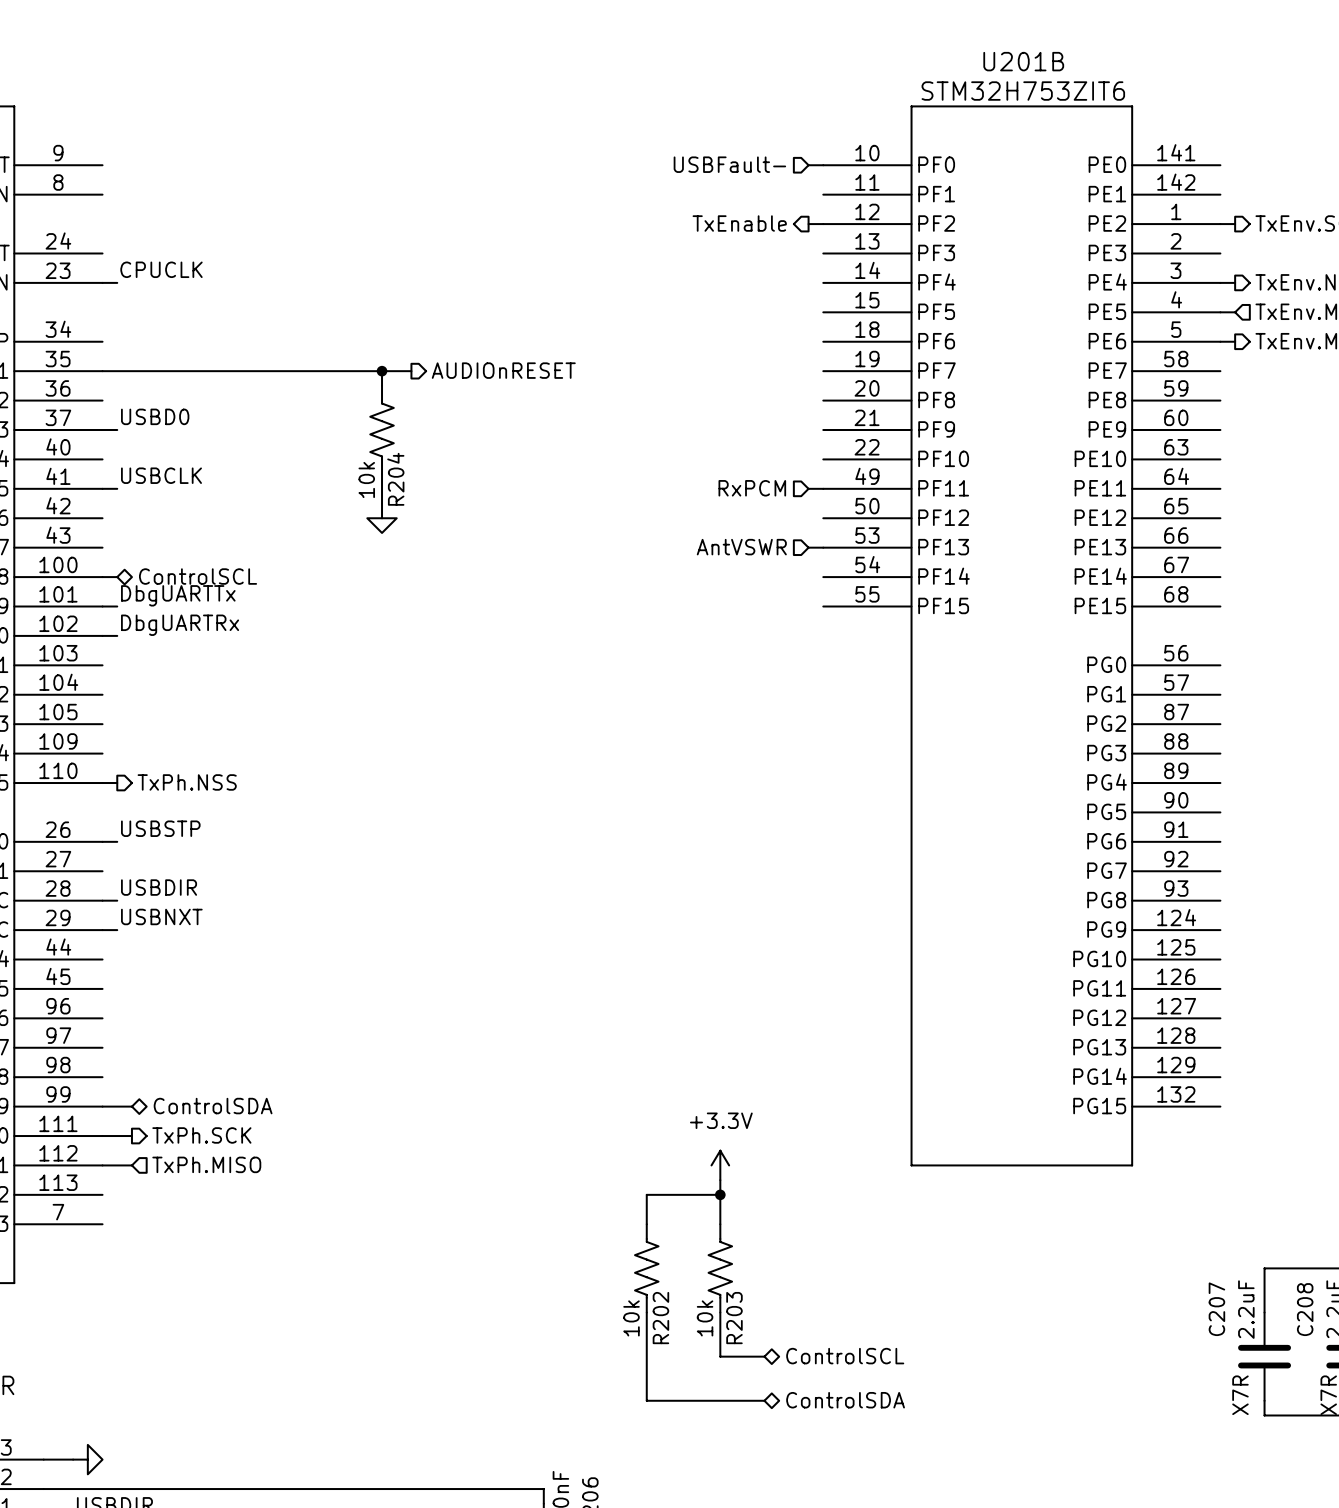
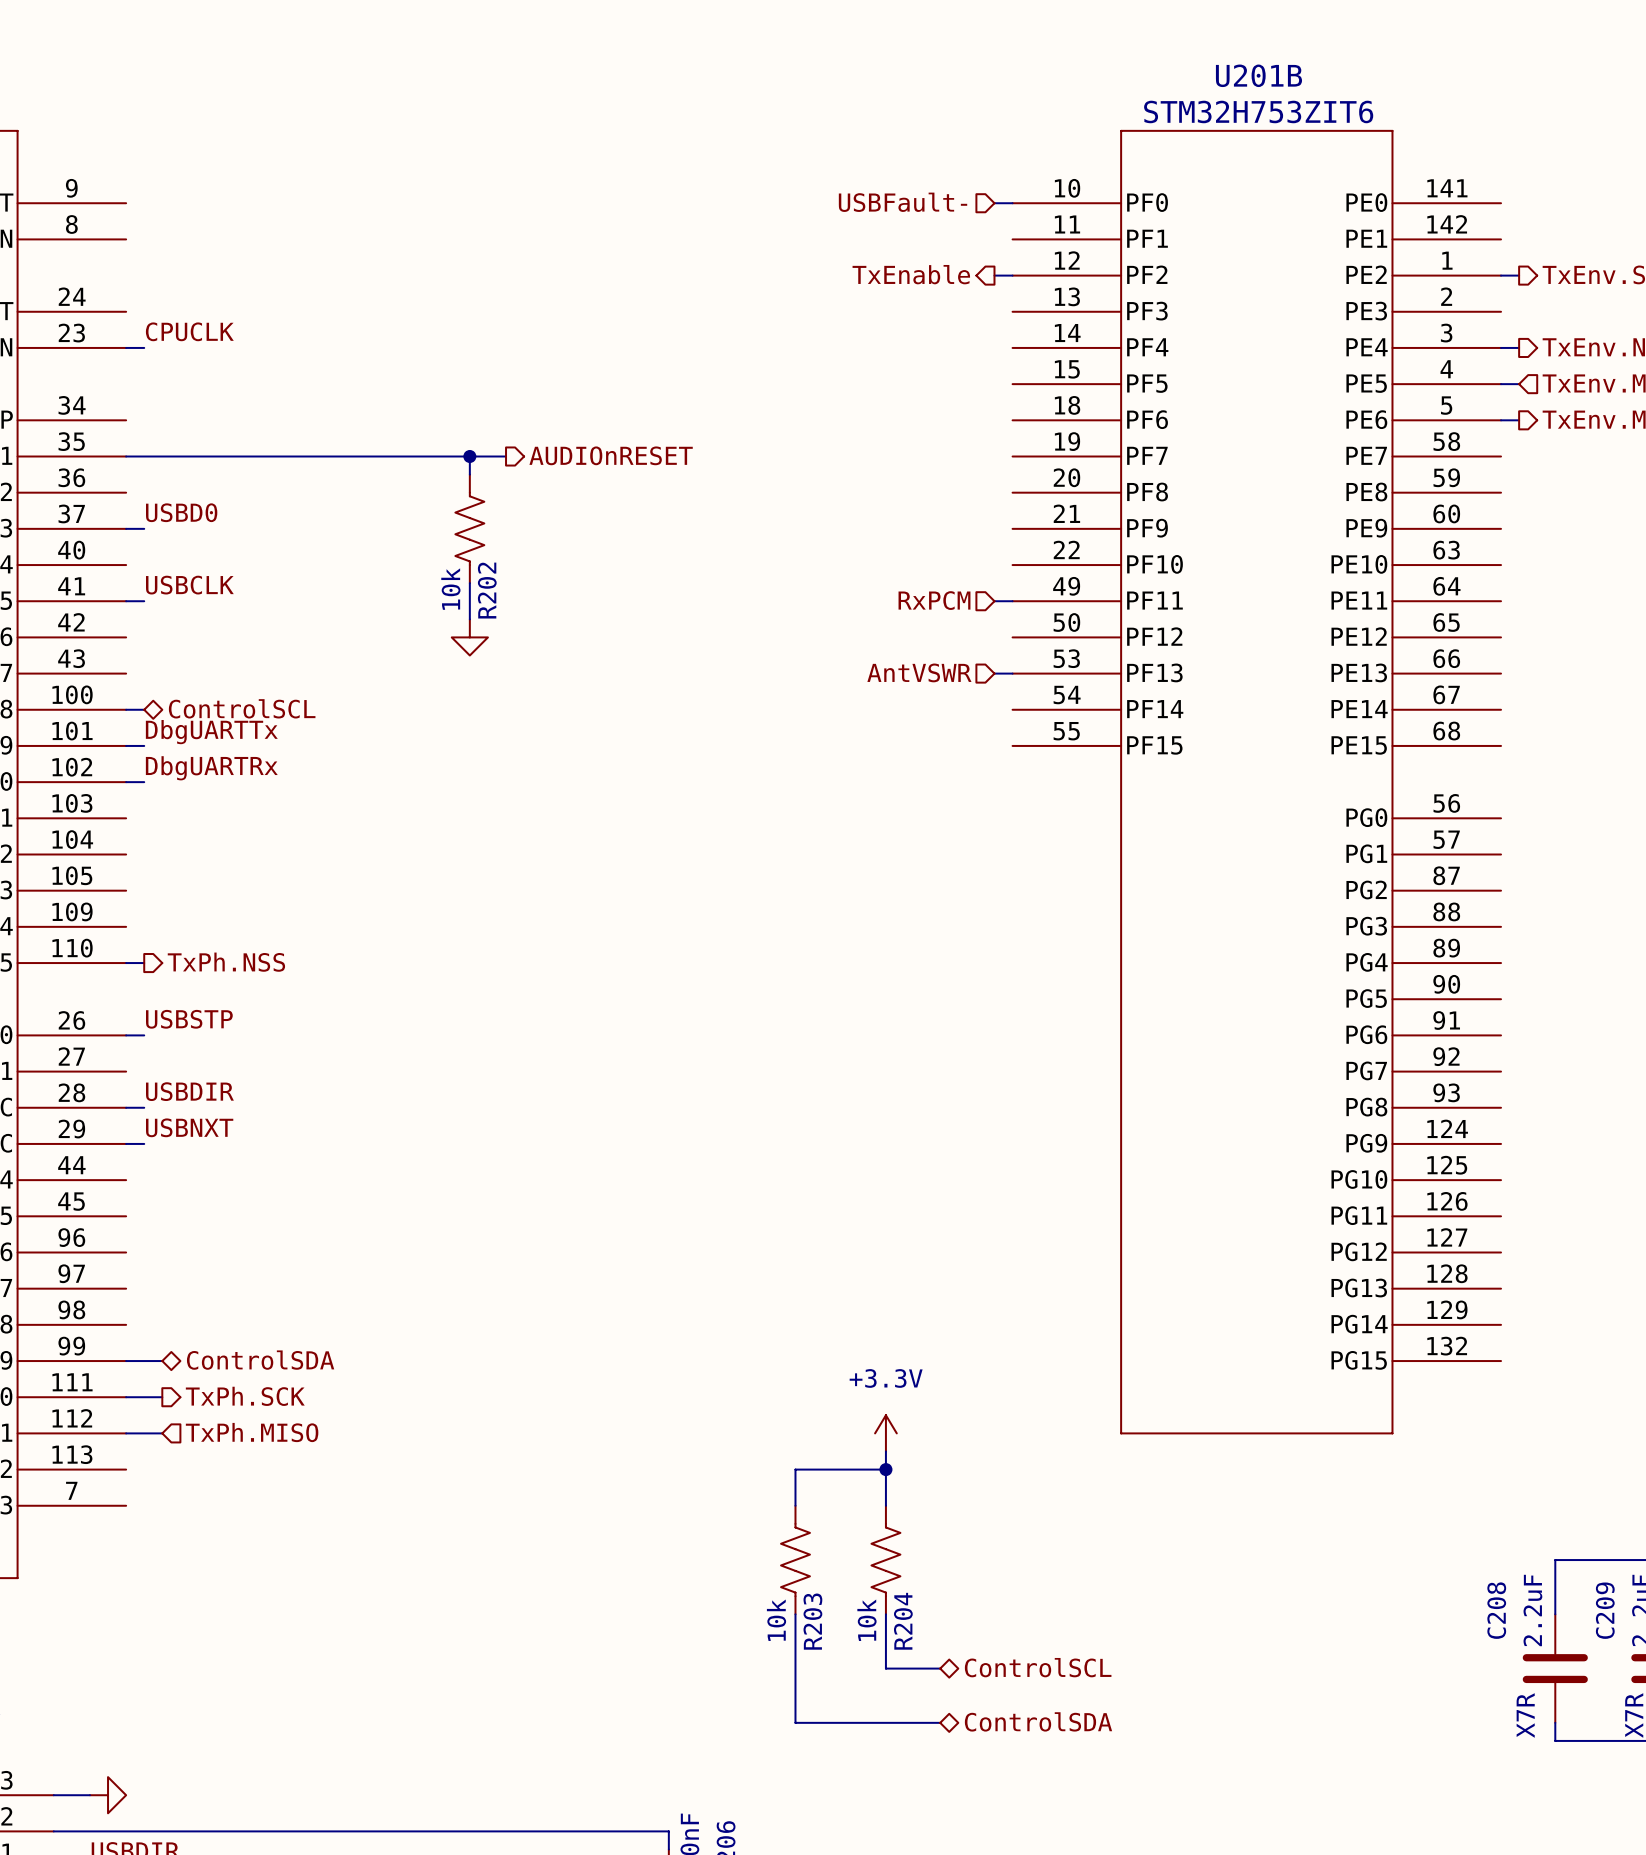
R204 name: R204 (395, 479) -> R202 (487, 590)
C207 name: C207 (1216, 1309) -> C208 (1496, 1610)
C208 name: C208 (1305, 1309) -> C209 (1605, 1610)
R202 name: R202 (660, 1318) -> R203 (812, 1621)
R203 name: R203 (734, 1318) -> R204 (903, 1621)

